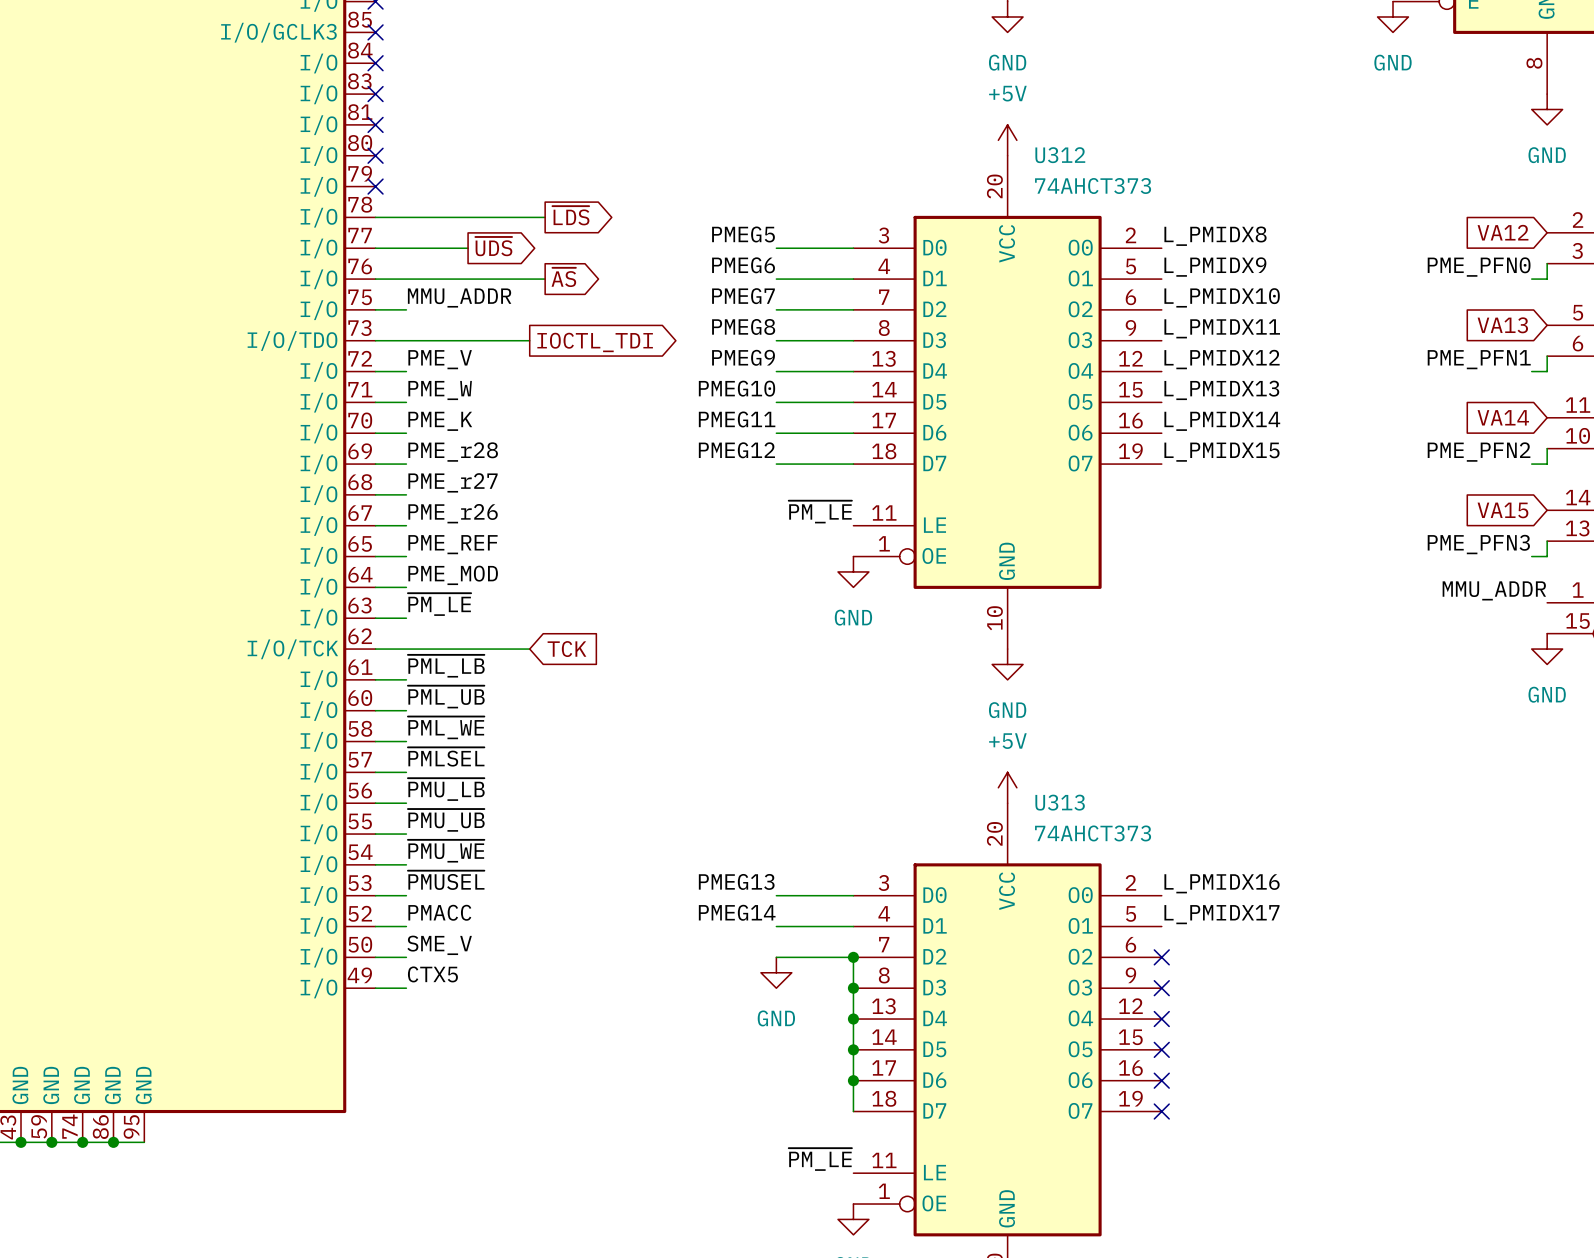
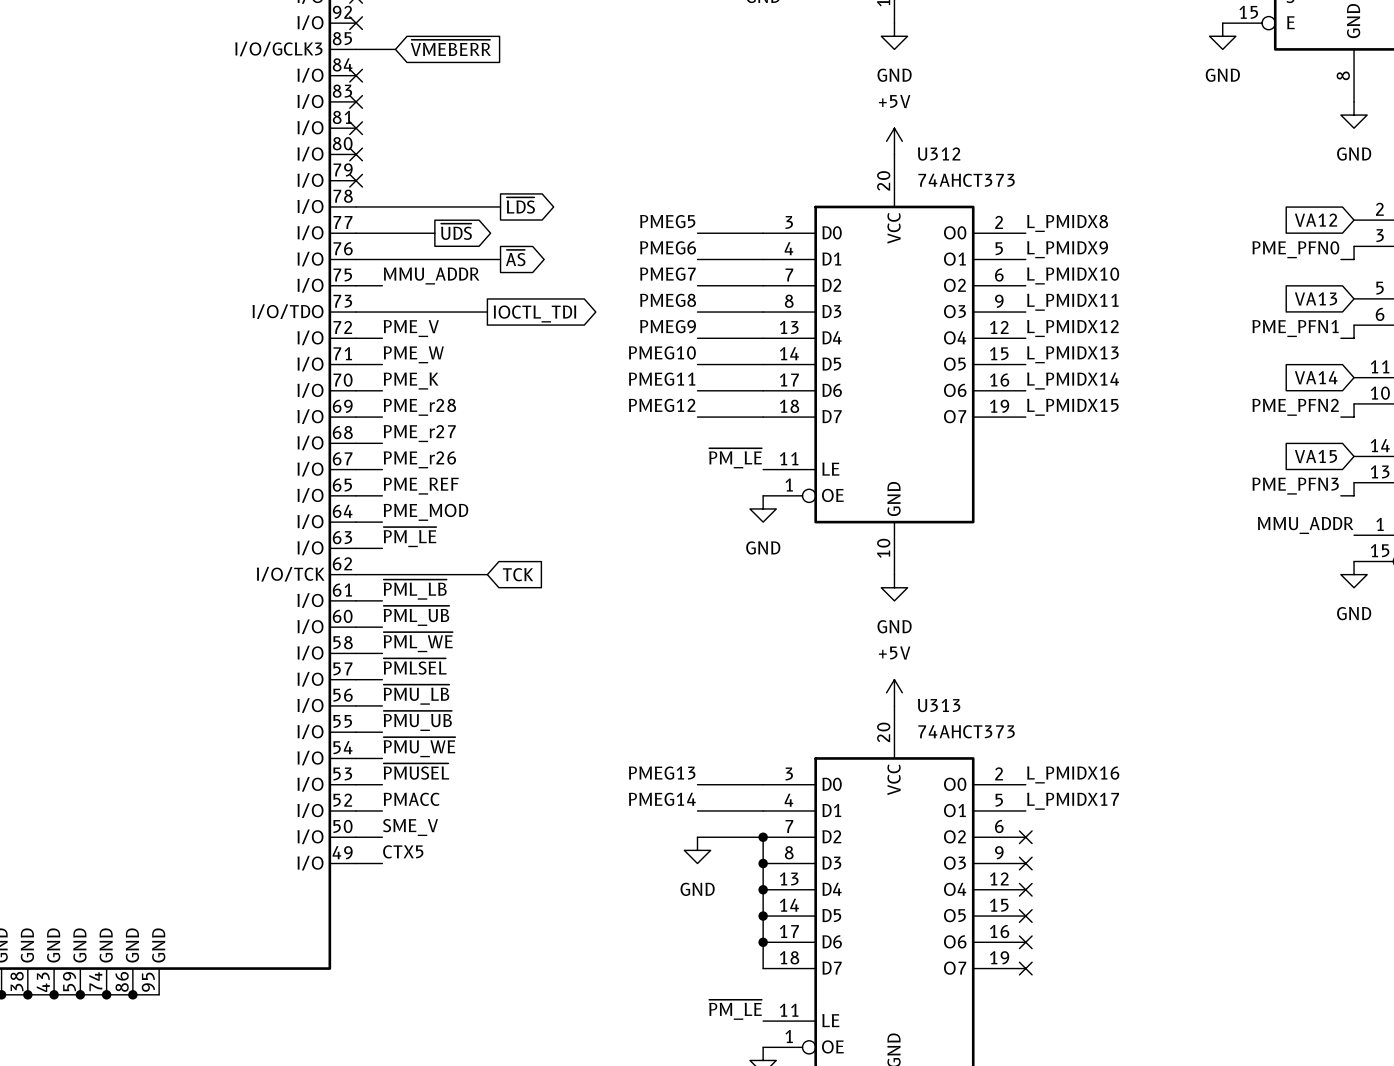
global label: none -> ~{VMEBERR} (450, 47)
wire: none -> (356, 49) (395, 49)
no-connect mark: (375, 32) -> none

